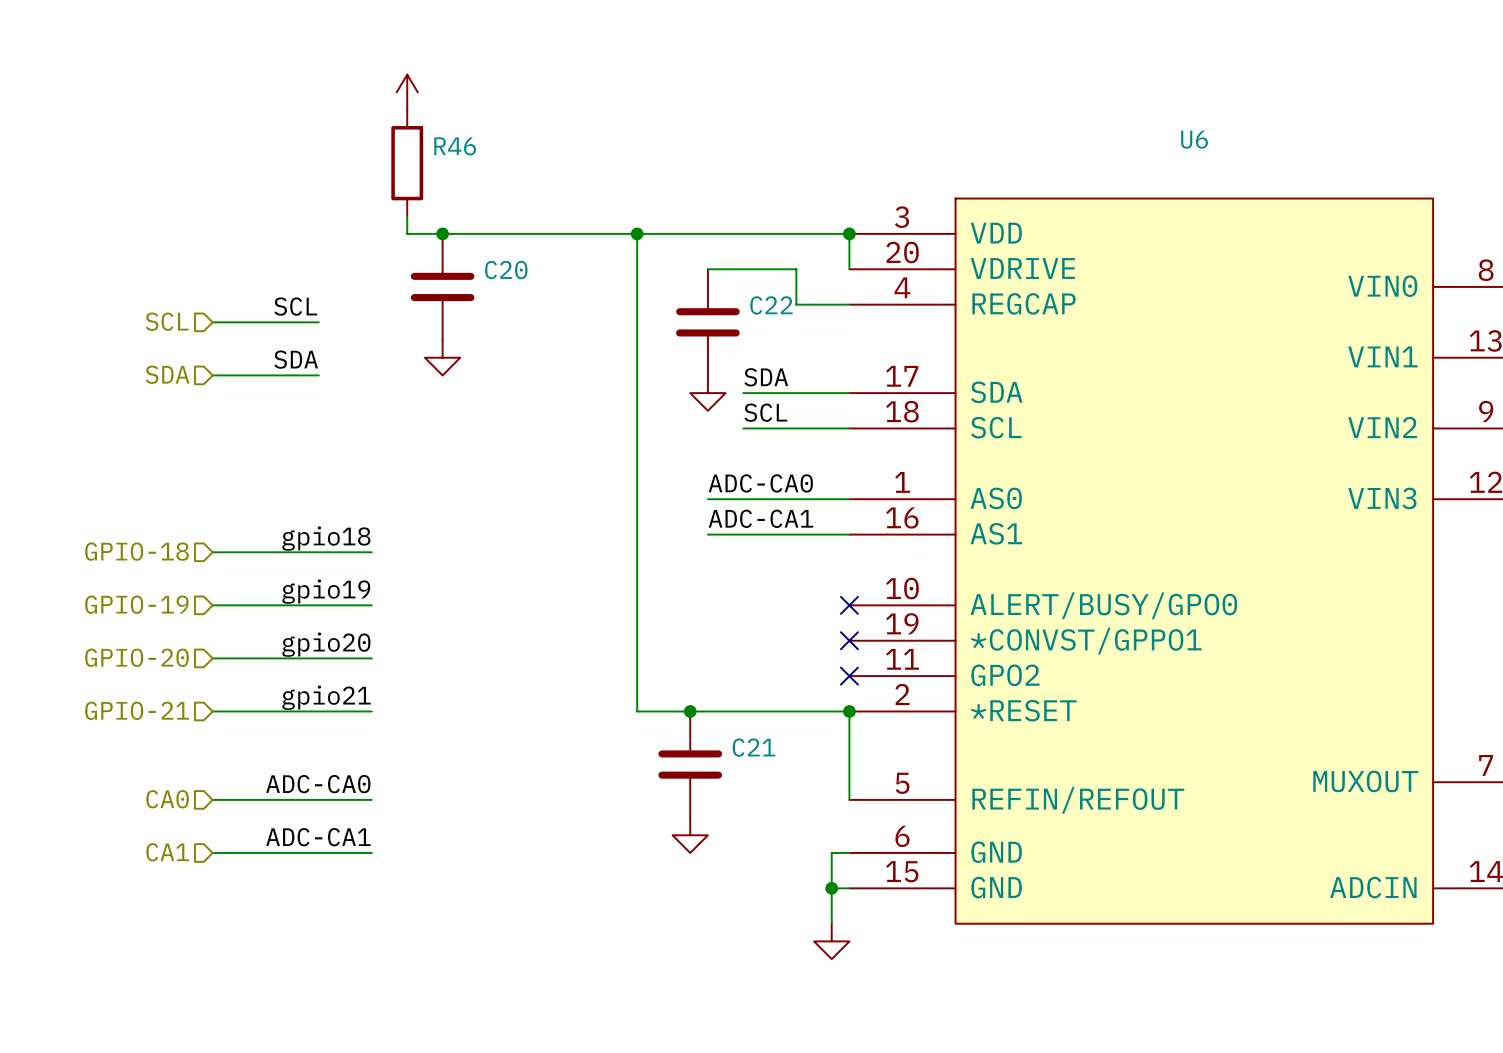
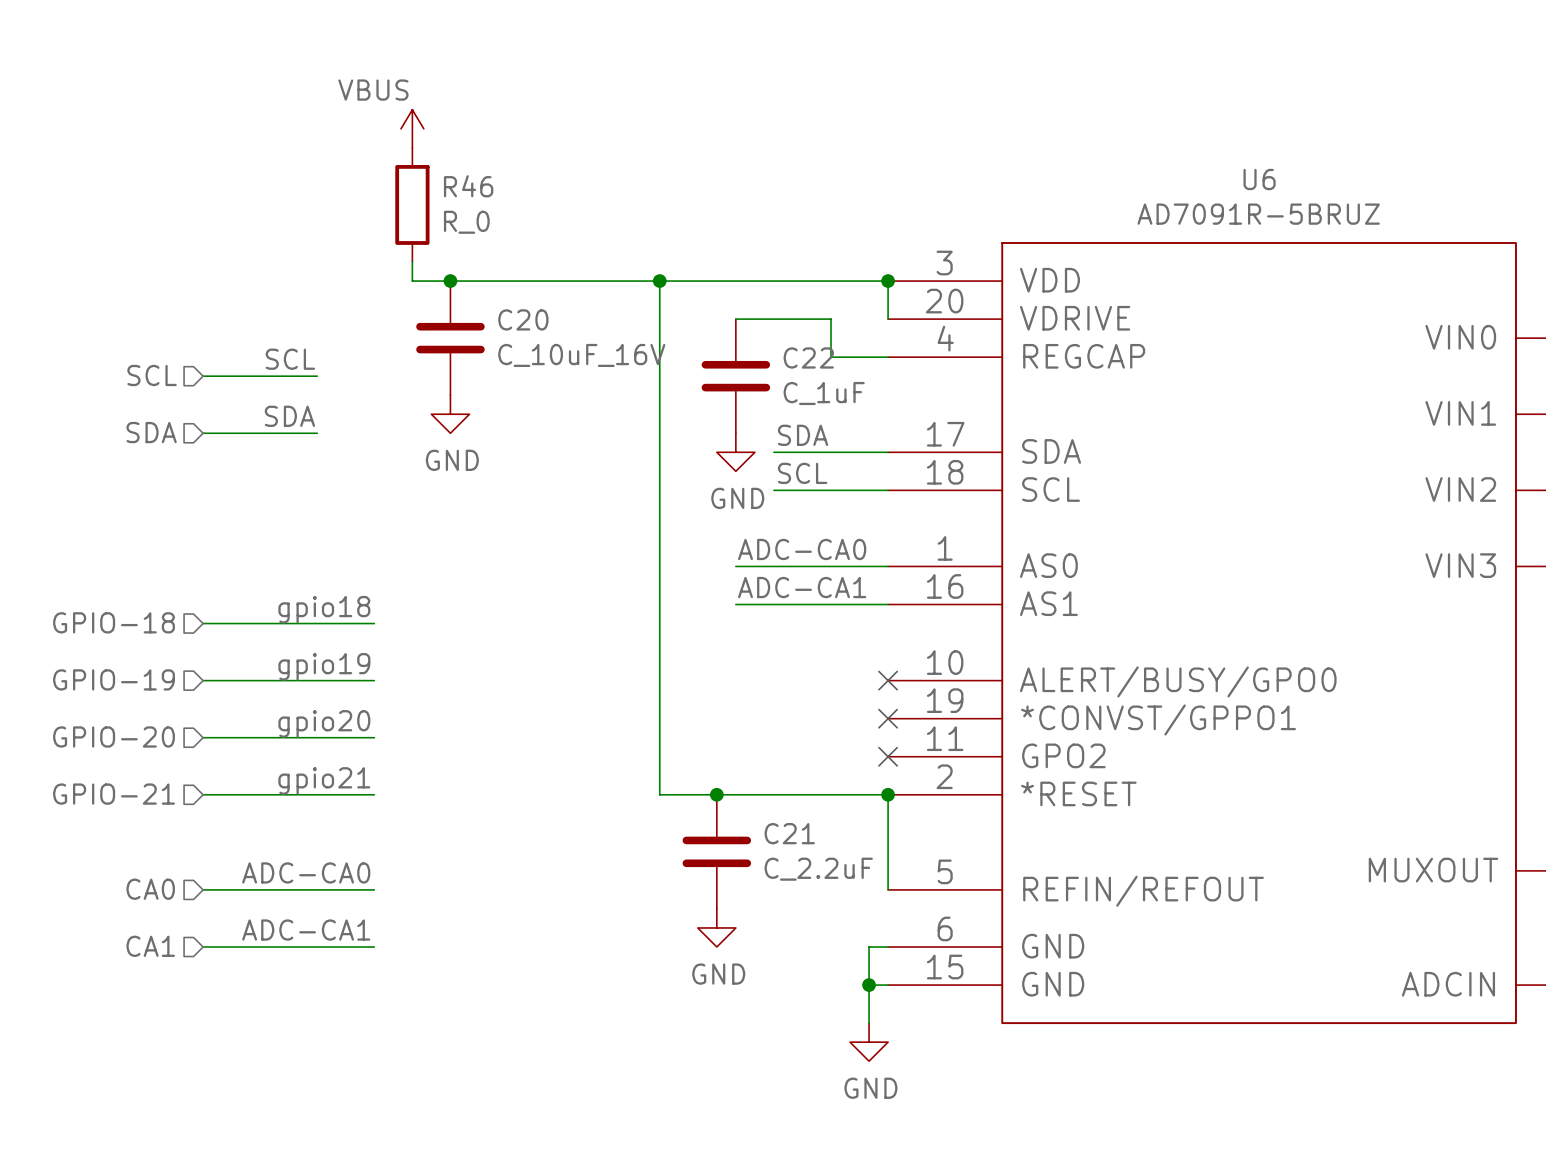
power symbol text: none -> VBUS (373, 90)
U6 value: none -> AD7091R-5BRUZ (1258, 214)
R46 value: none -> R_0 (466, 222)
C20 value: none -> C_10uF_16V (581, 355)
C22 value: none -> C_1uF (824, 393)
power symbol text: none -> GND (452, 460)
power symbol text: none -> GND (737, 498)
C21 value: none -> C_2.2uF (818, 869)
power symbol text: none -> GND (718, 974)
power symbol text: none -> GND (870, 1088)

